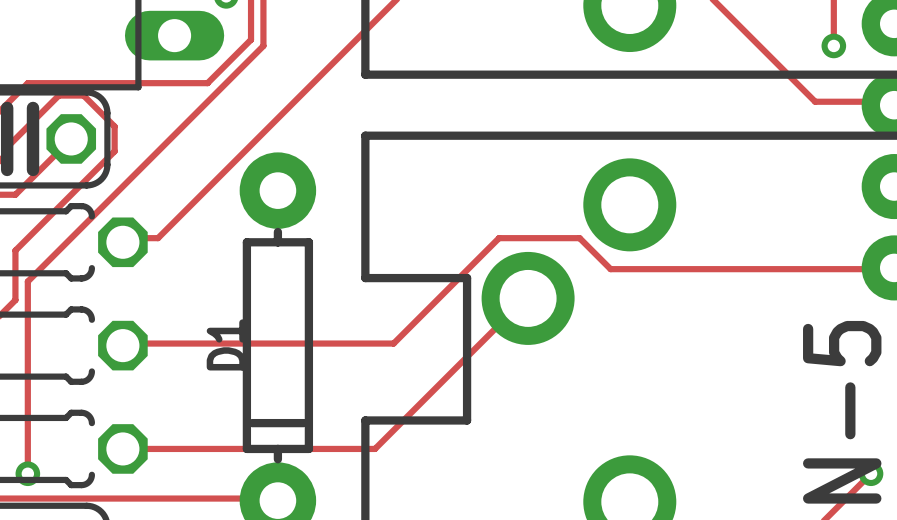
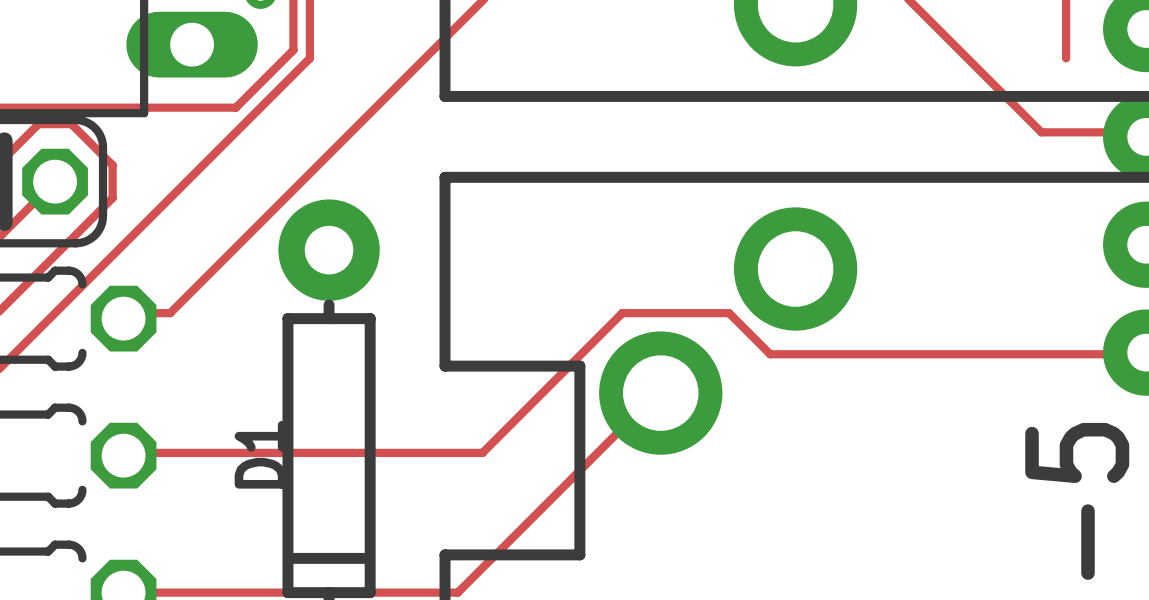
via: (833, 45) -> none

